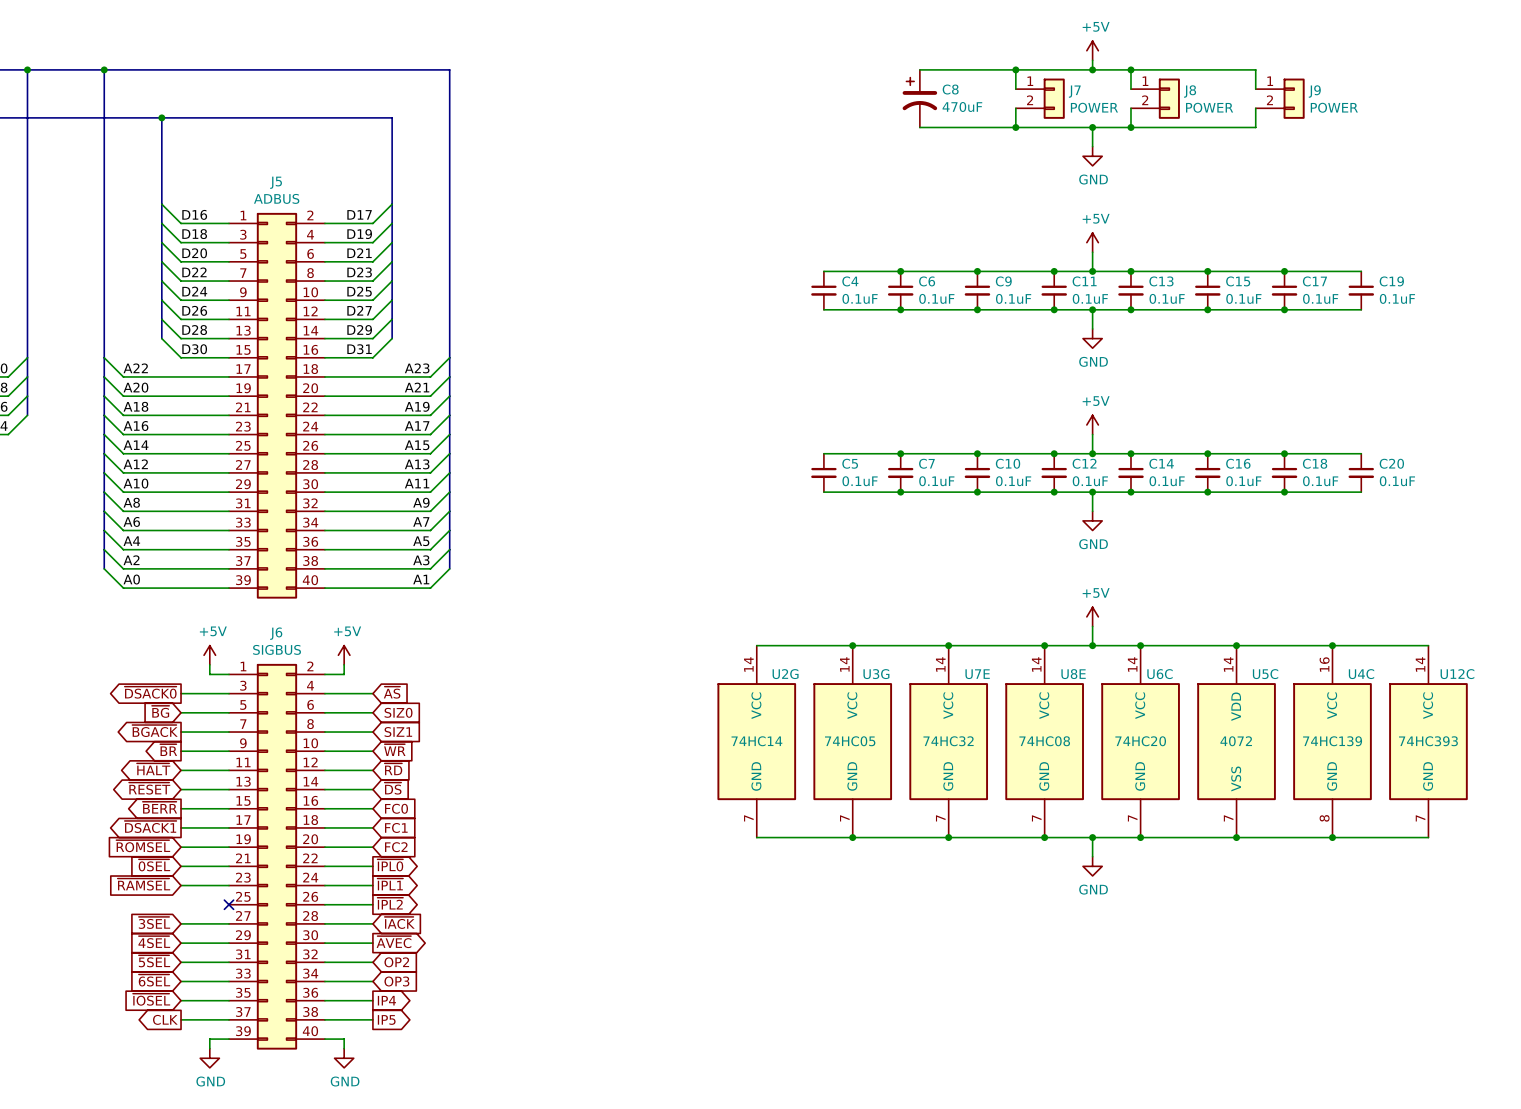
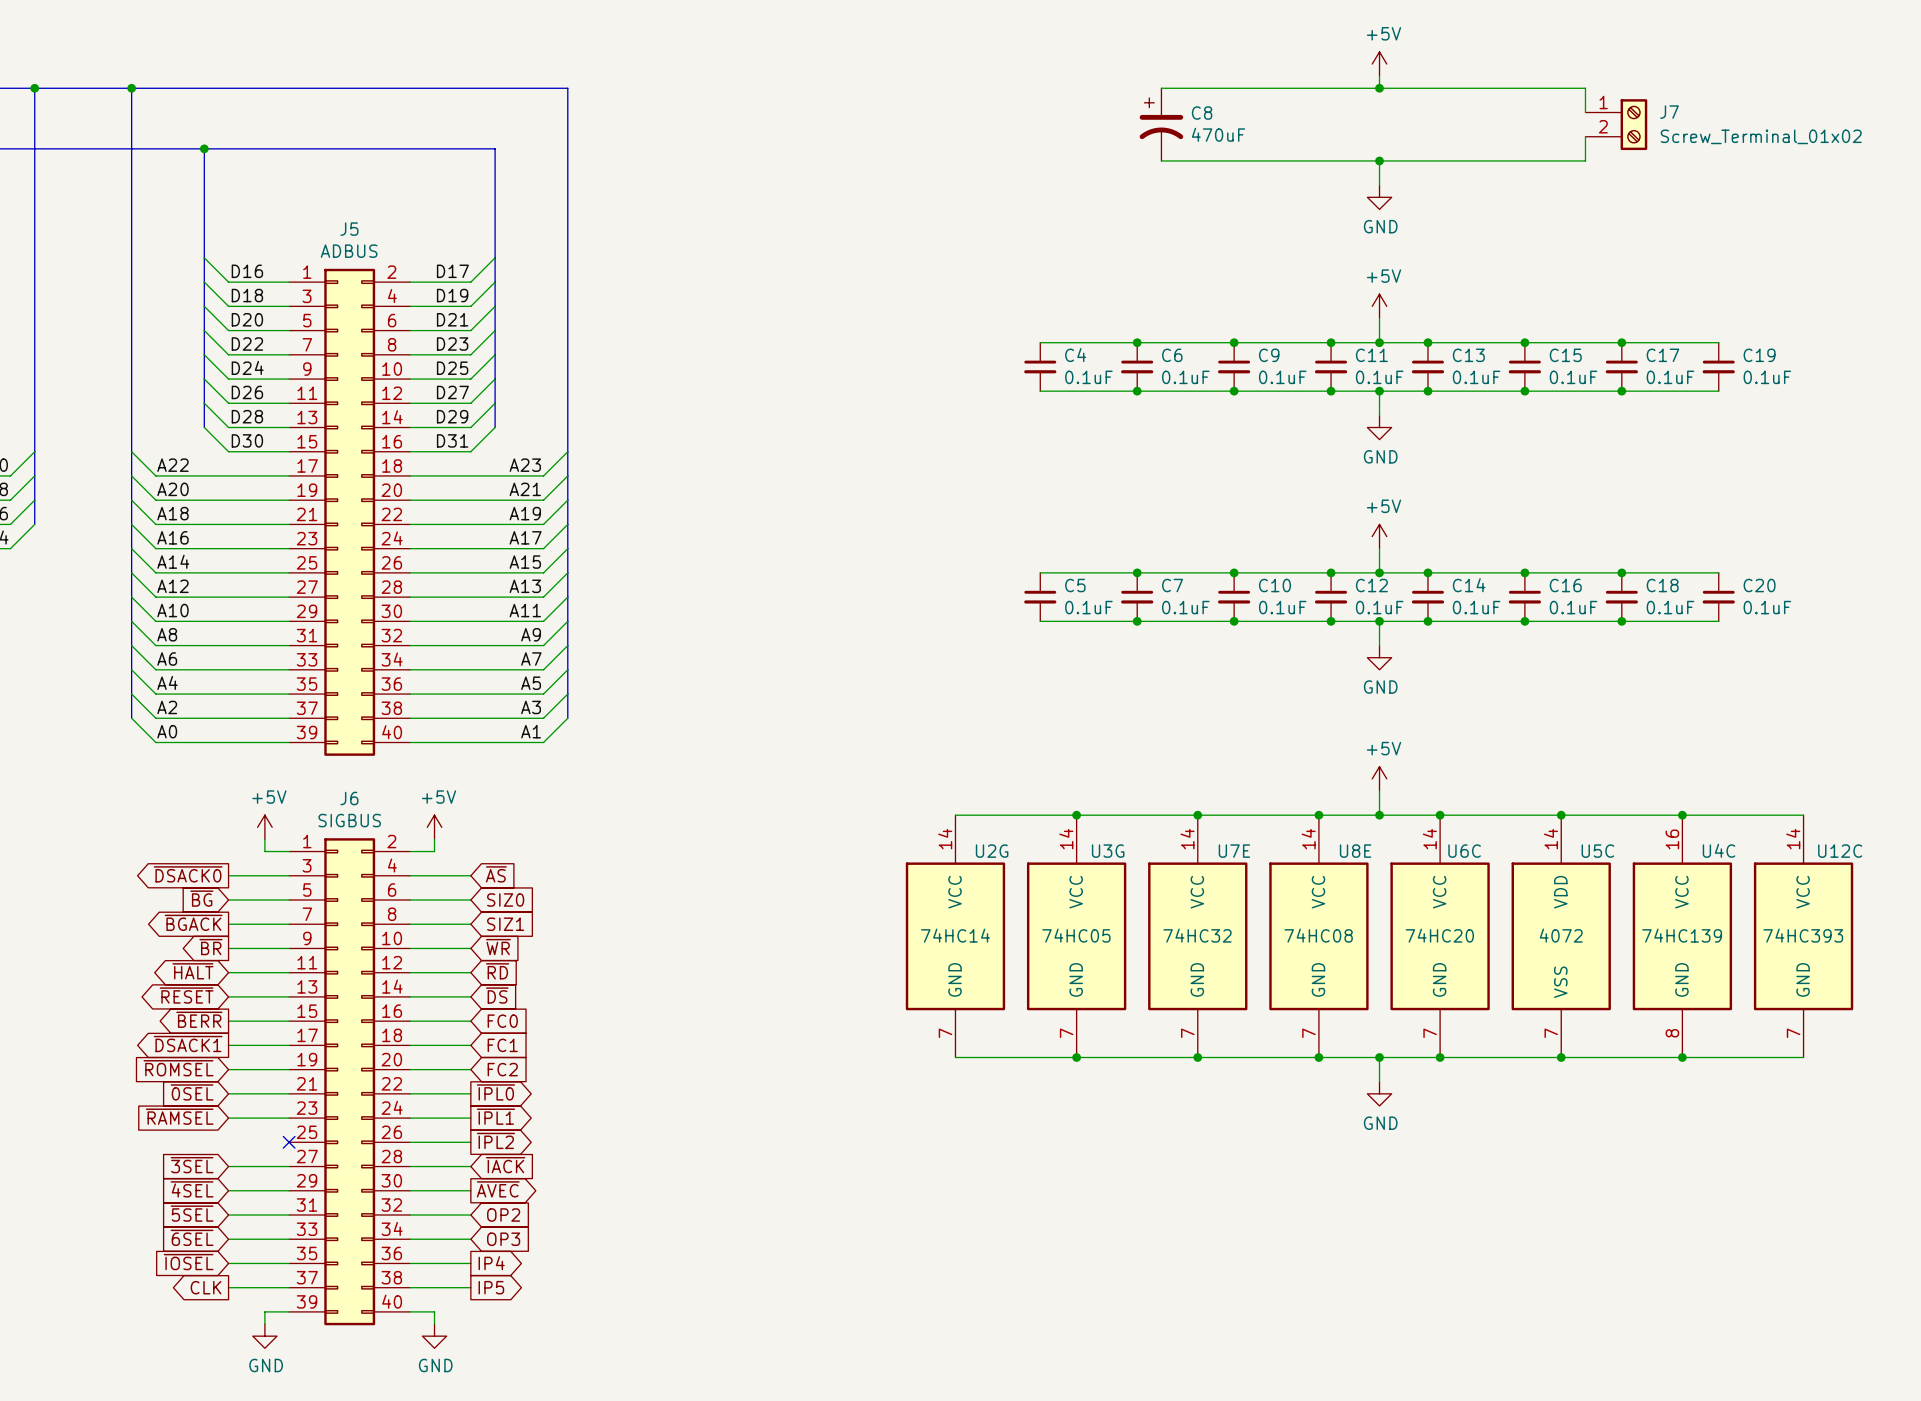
wire: (1015, 69) (1015, 89) -> none
junction: (1015, 69) -> none
wire: (1130, 69) (1130, 89) -> none
junction: (1130, 69) -> none
J7 symbol: [1015, 78, 1065, 119] -> [1585, 99, 1648, 151]
J8: POWER (1155, 98) -> none
J9: POWER (1280, 98) -> none
J7 value: POWER (1094, 107) -> Screw_Terminal_01x02 (1761, 136)
wire: (1015, 108) (1015, 127) -> none
wire: (1130, 108) (1130, 127) -> none
junction: (1015, 127) -> none
junction: (1130, 127) -> none

